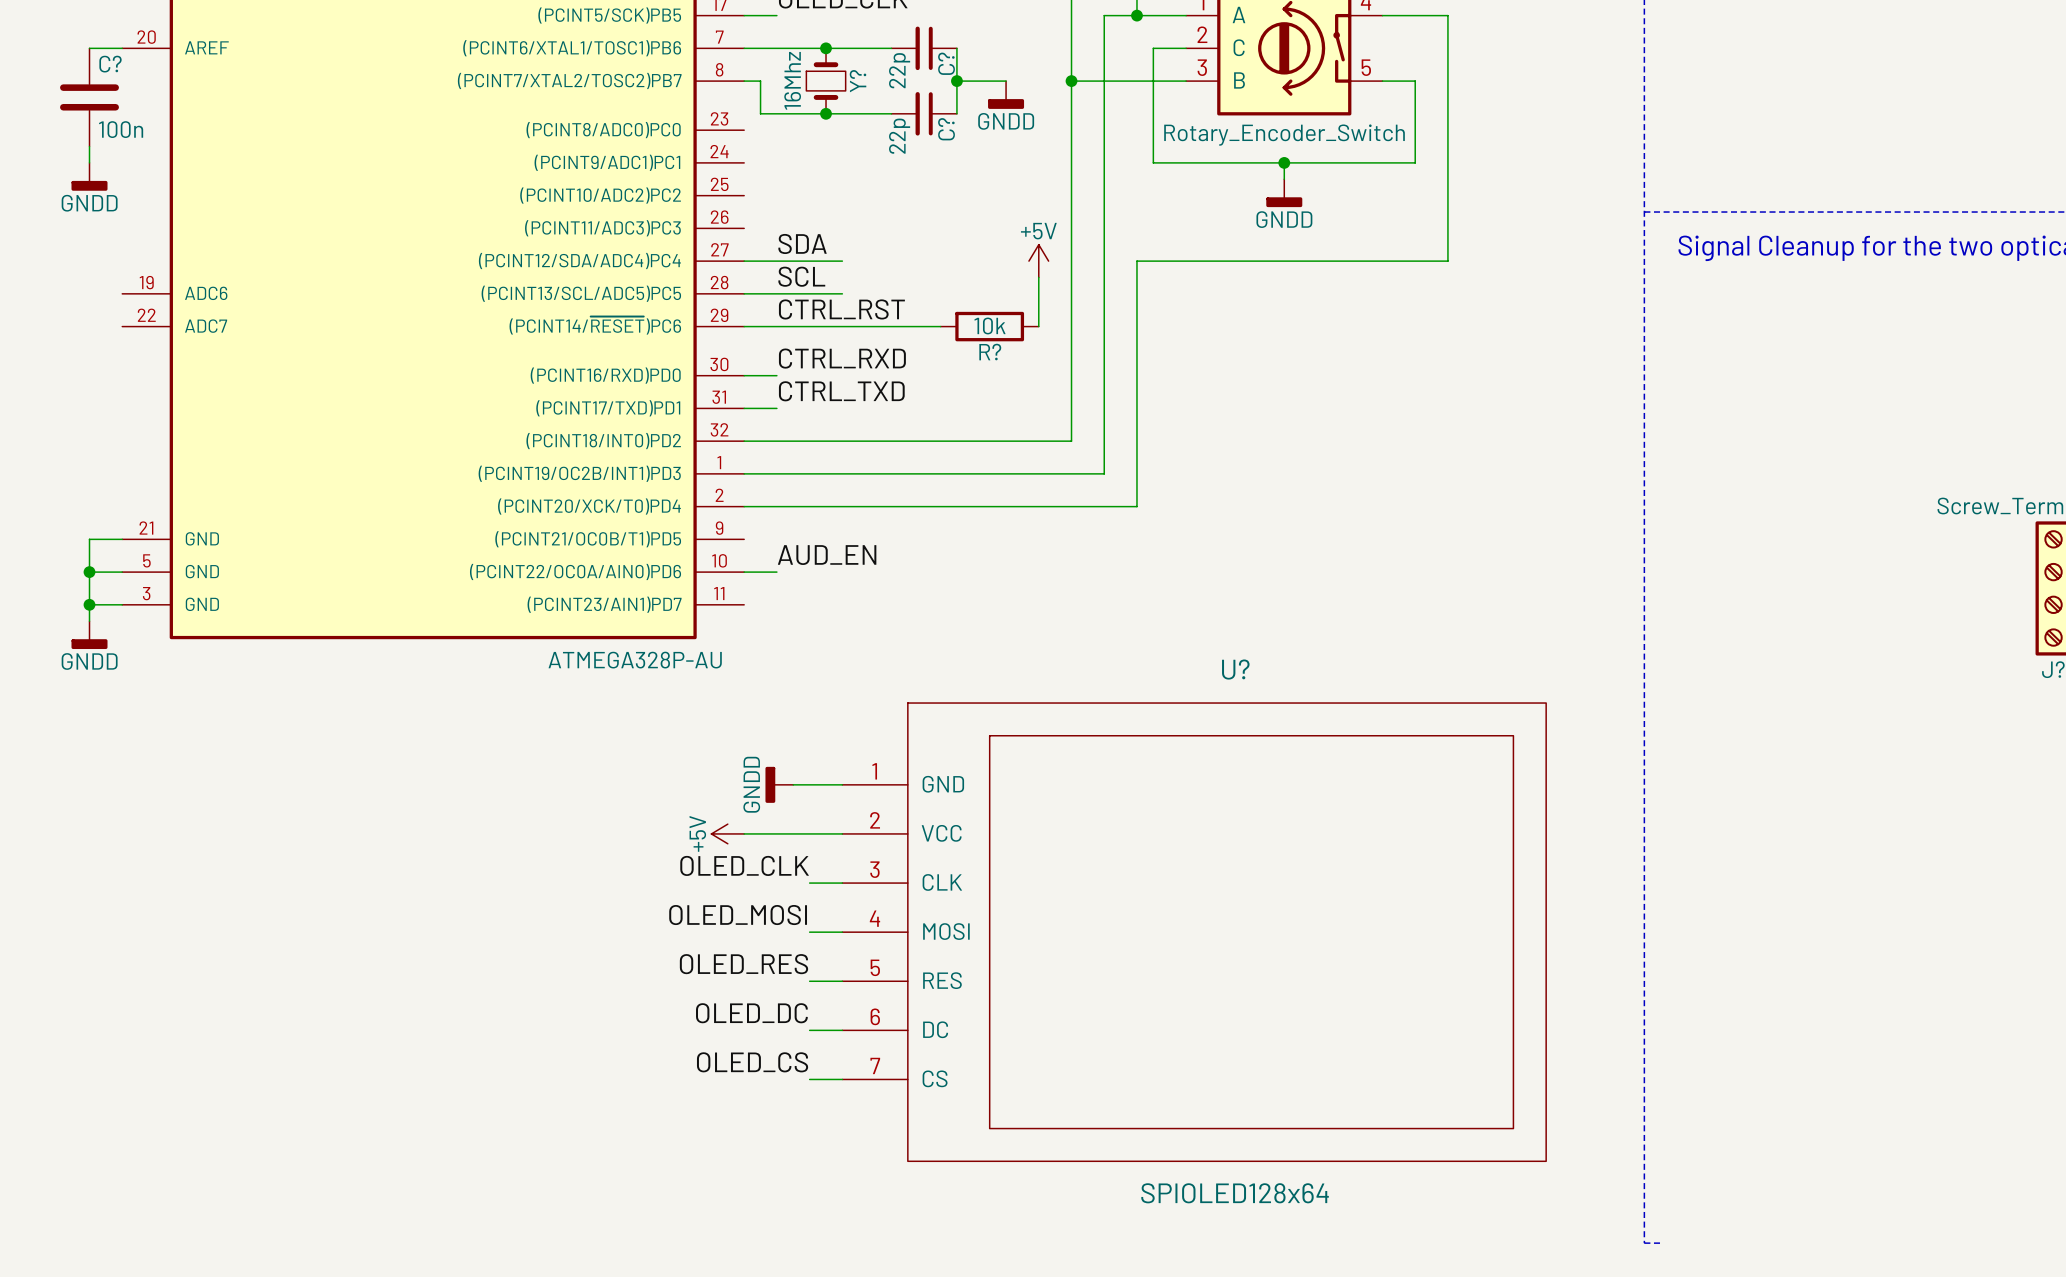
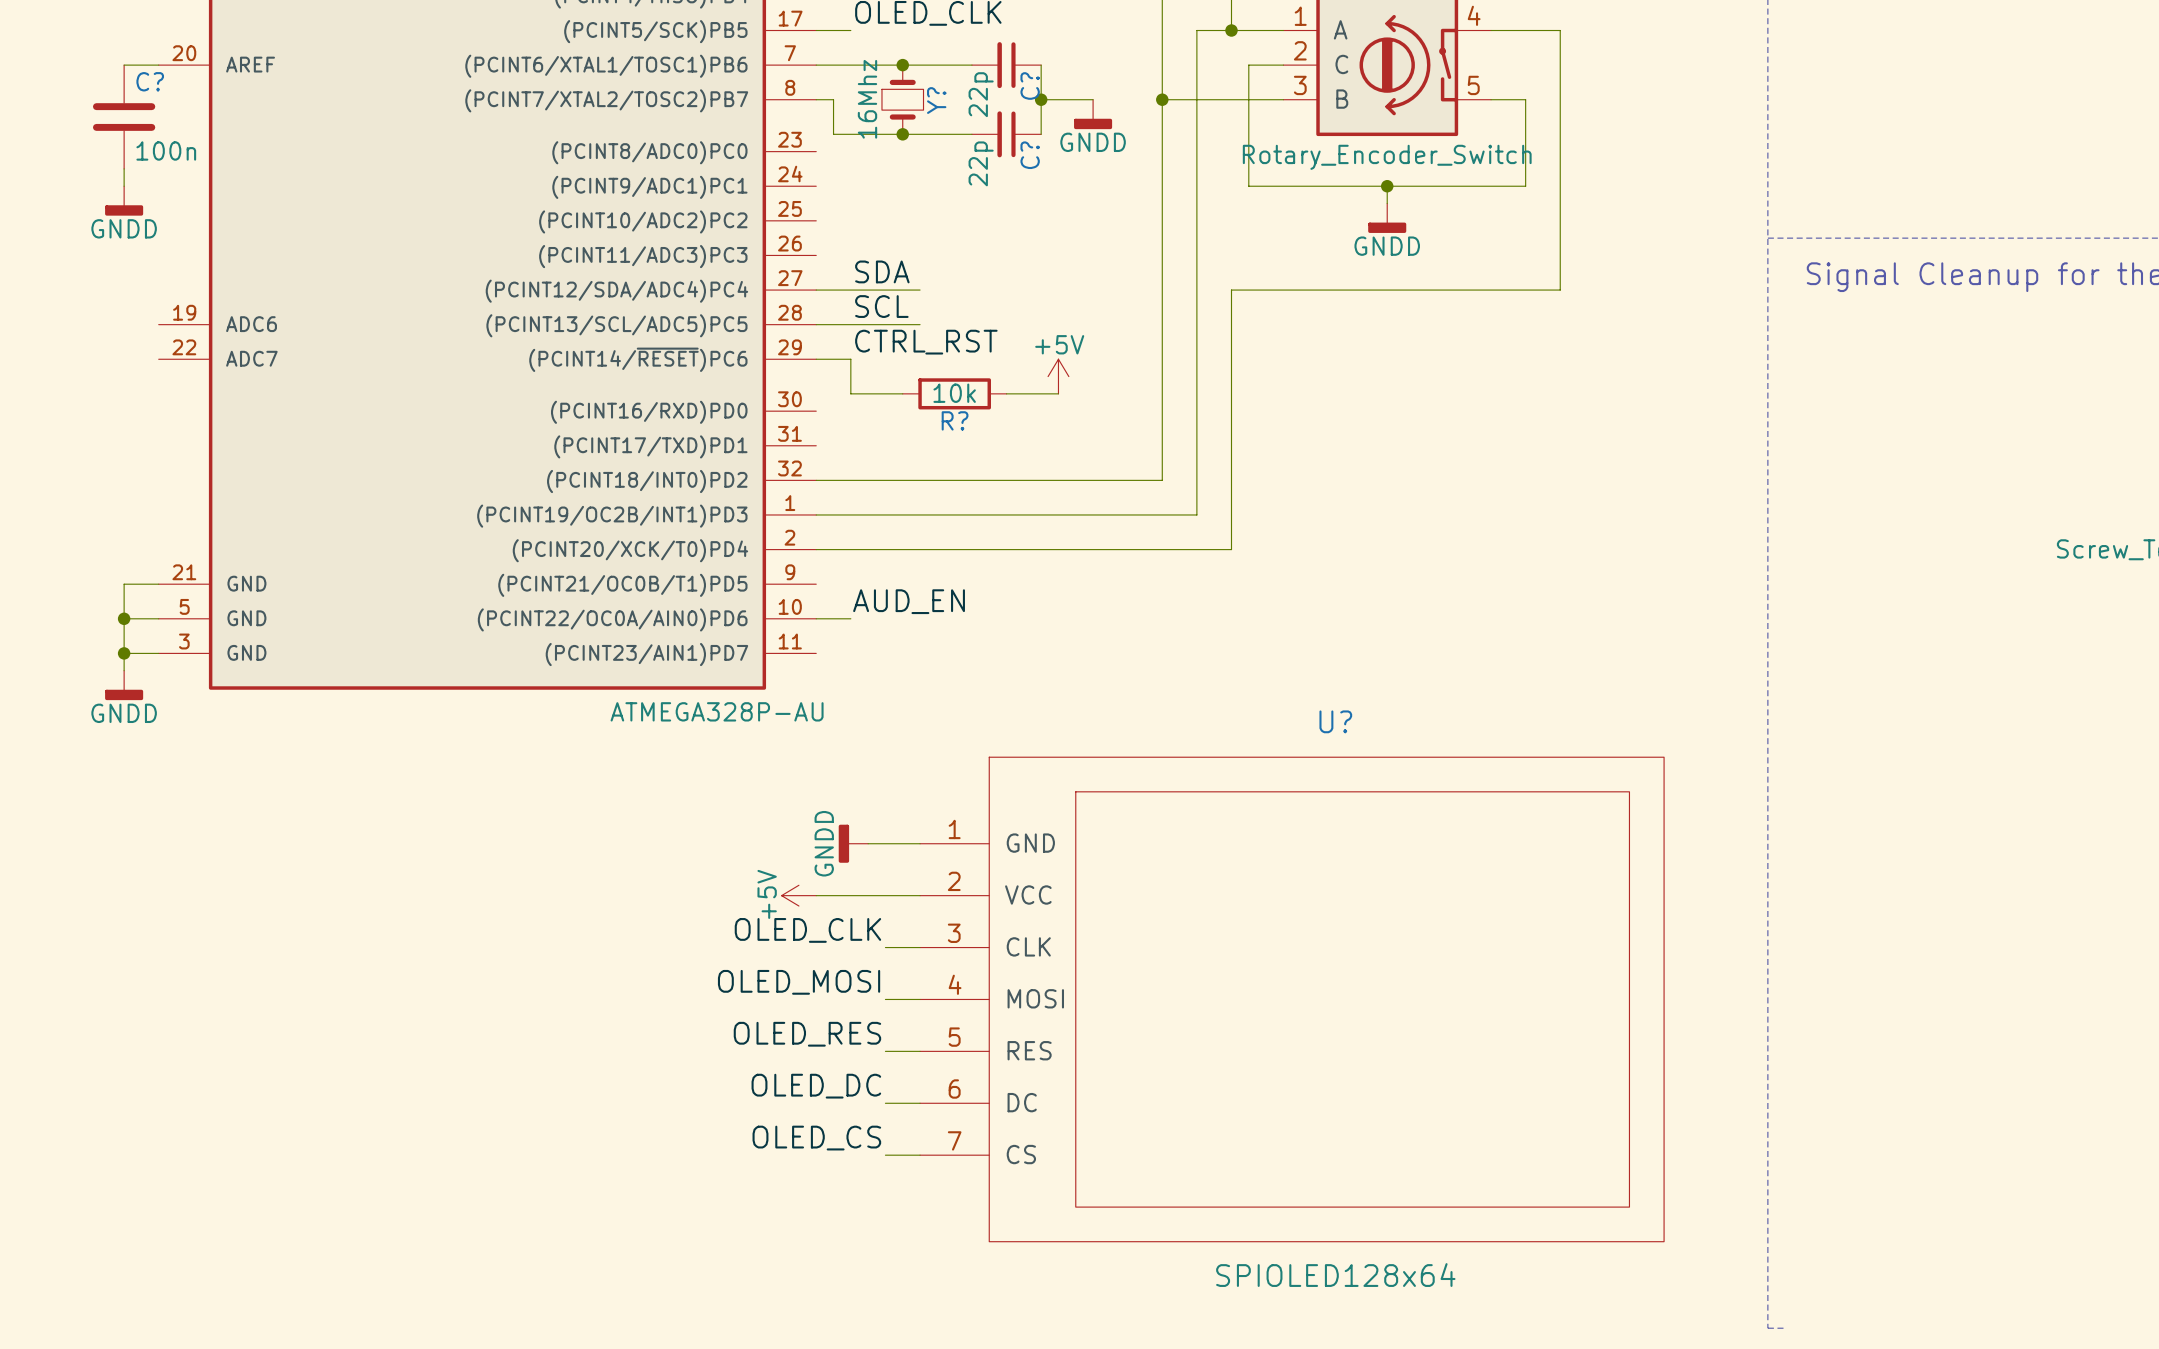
power symbol position: +5V (1038, 261) -> +5V (1058, 376)
wire: (1038, 277) (1038, 326) -> none
wire: (776, 326) (940, 326) -> (850, 359) (850, 393) (902, 393)
R? position: (989, 326) -> (954, 393)
label: CTRL_RXD (842, 358) -> none
wire: none -> (1006, 393) (1058, 393)
wire: (744, 375) (776, 375) -> none
label: CTRL_TXD (841, 391) -> none
wire: (744, 408) (776, 408) -> none

